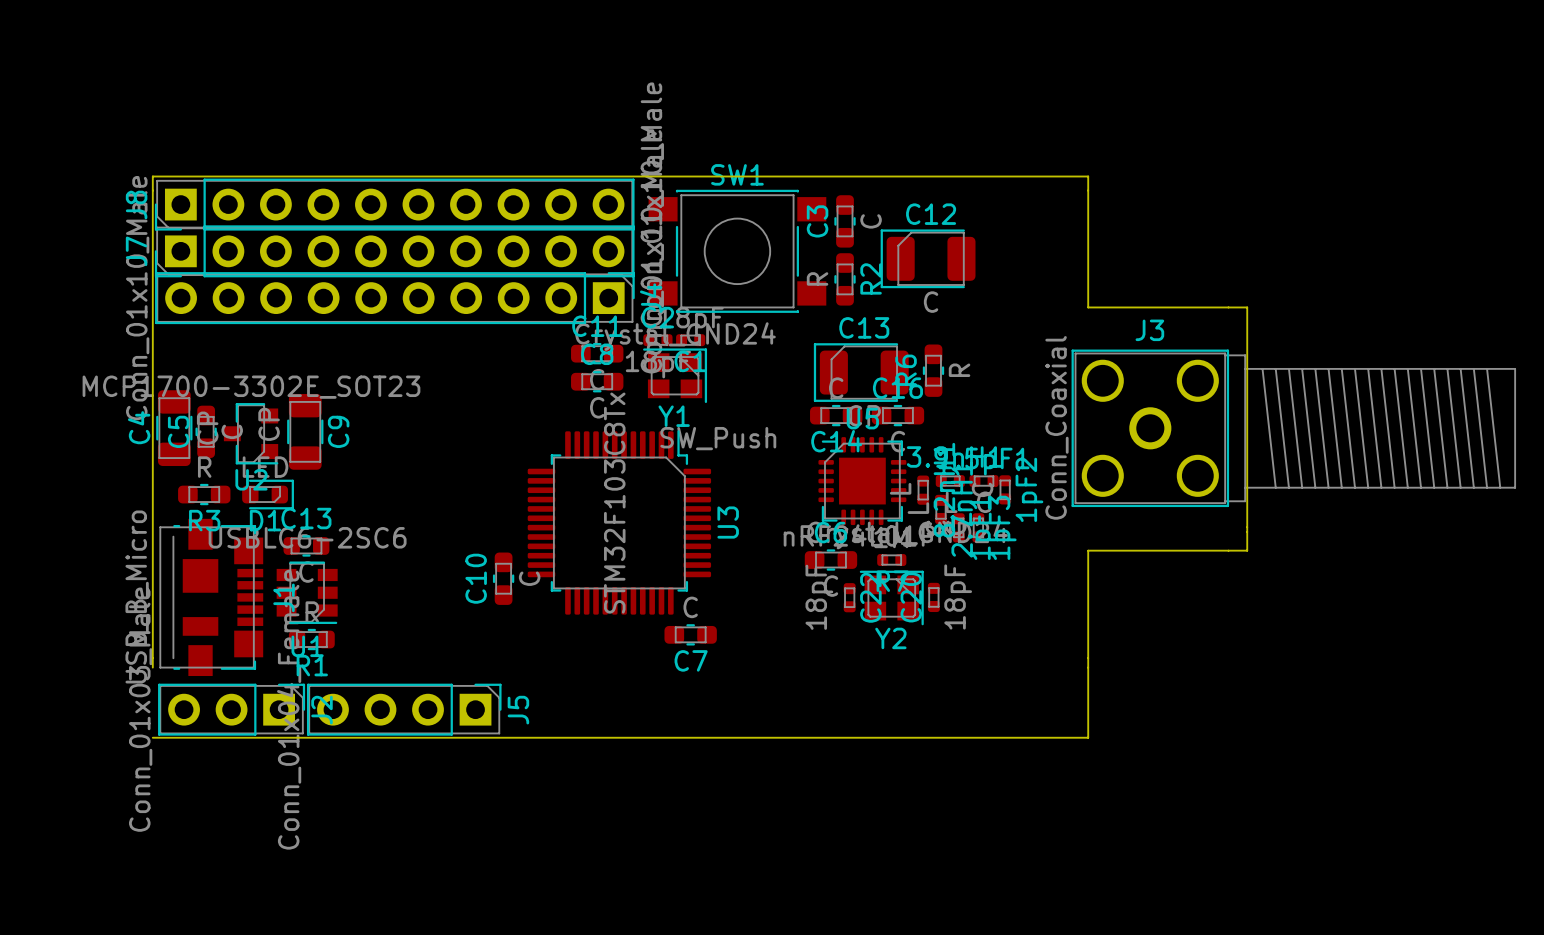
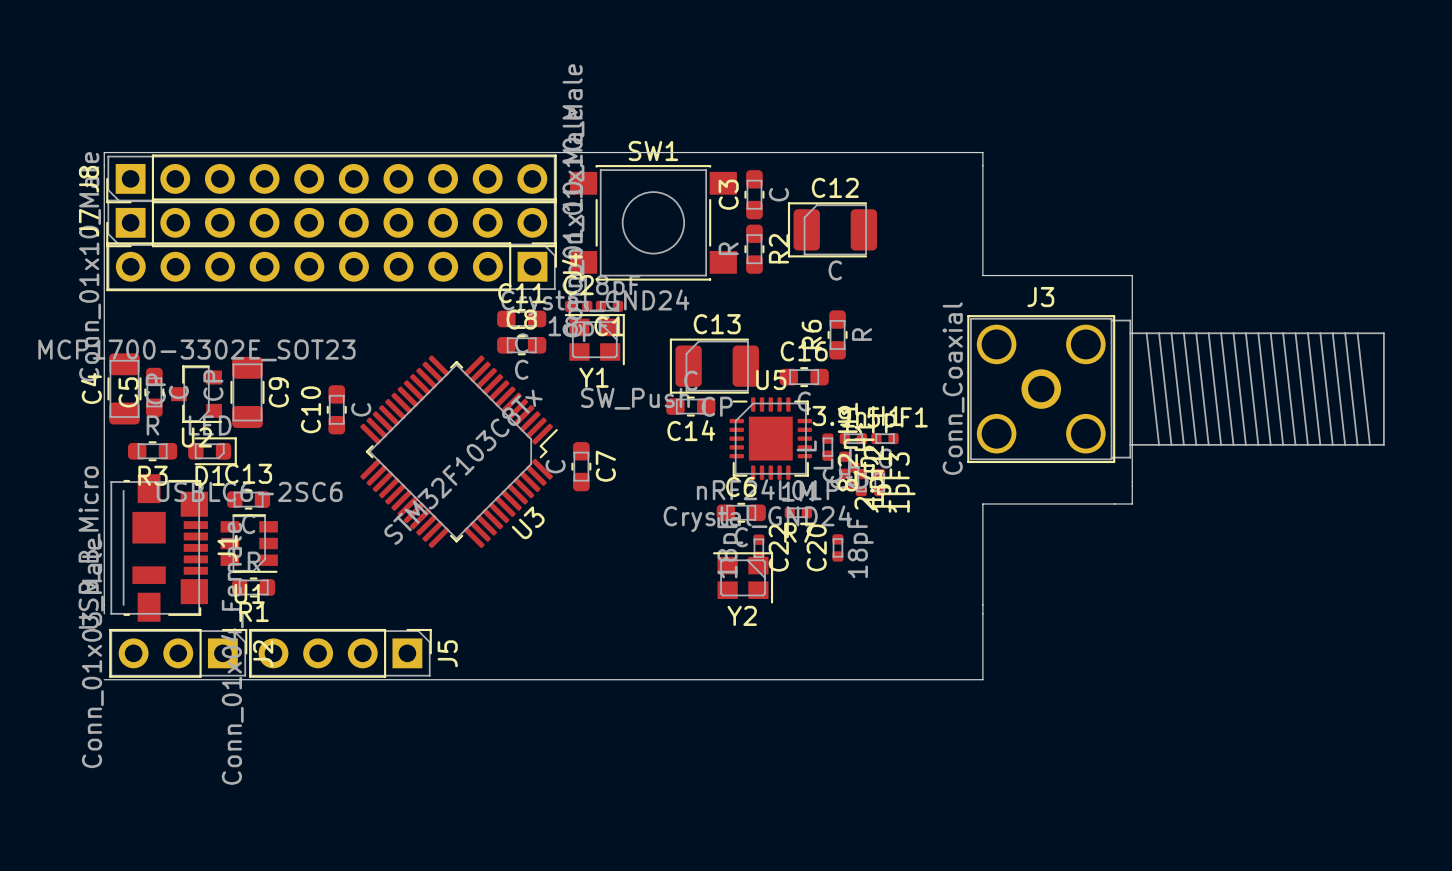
C13 position: (861, 372) -> (714, 366)
C14 position: (836, 415) -> (690, 406)
1pF2 position: (1005, 489) -> (853, 475)
U3 rotation: 0° (619, 522) -> 45° clockwise (459, 451)
C10 position: (503, 578) -> (336, 409)
Y2 position: (891, 597) -> (743, 577)
C7 value position: C (690, 607) -> C (555, 466)
C7 rotation: 0° (690, 634) -> 90° clockwise (581, 466)
C7 position: (690, 634) -> (581, 466)
C7 name position: C7 (691, 660) -> C7 (605, 466)

